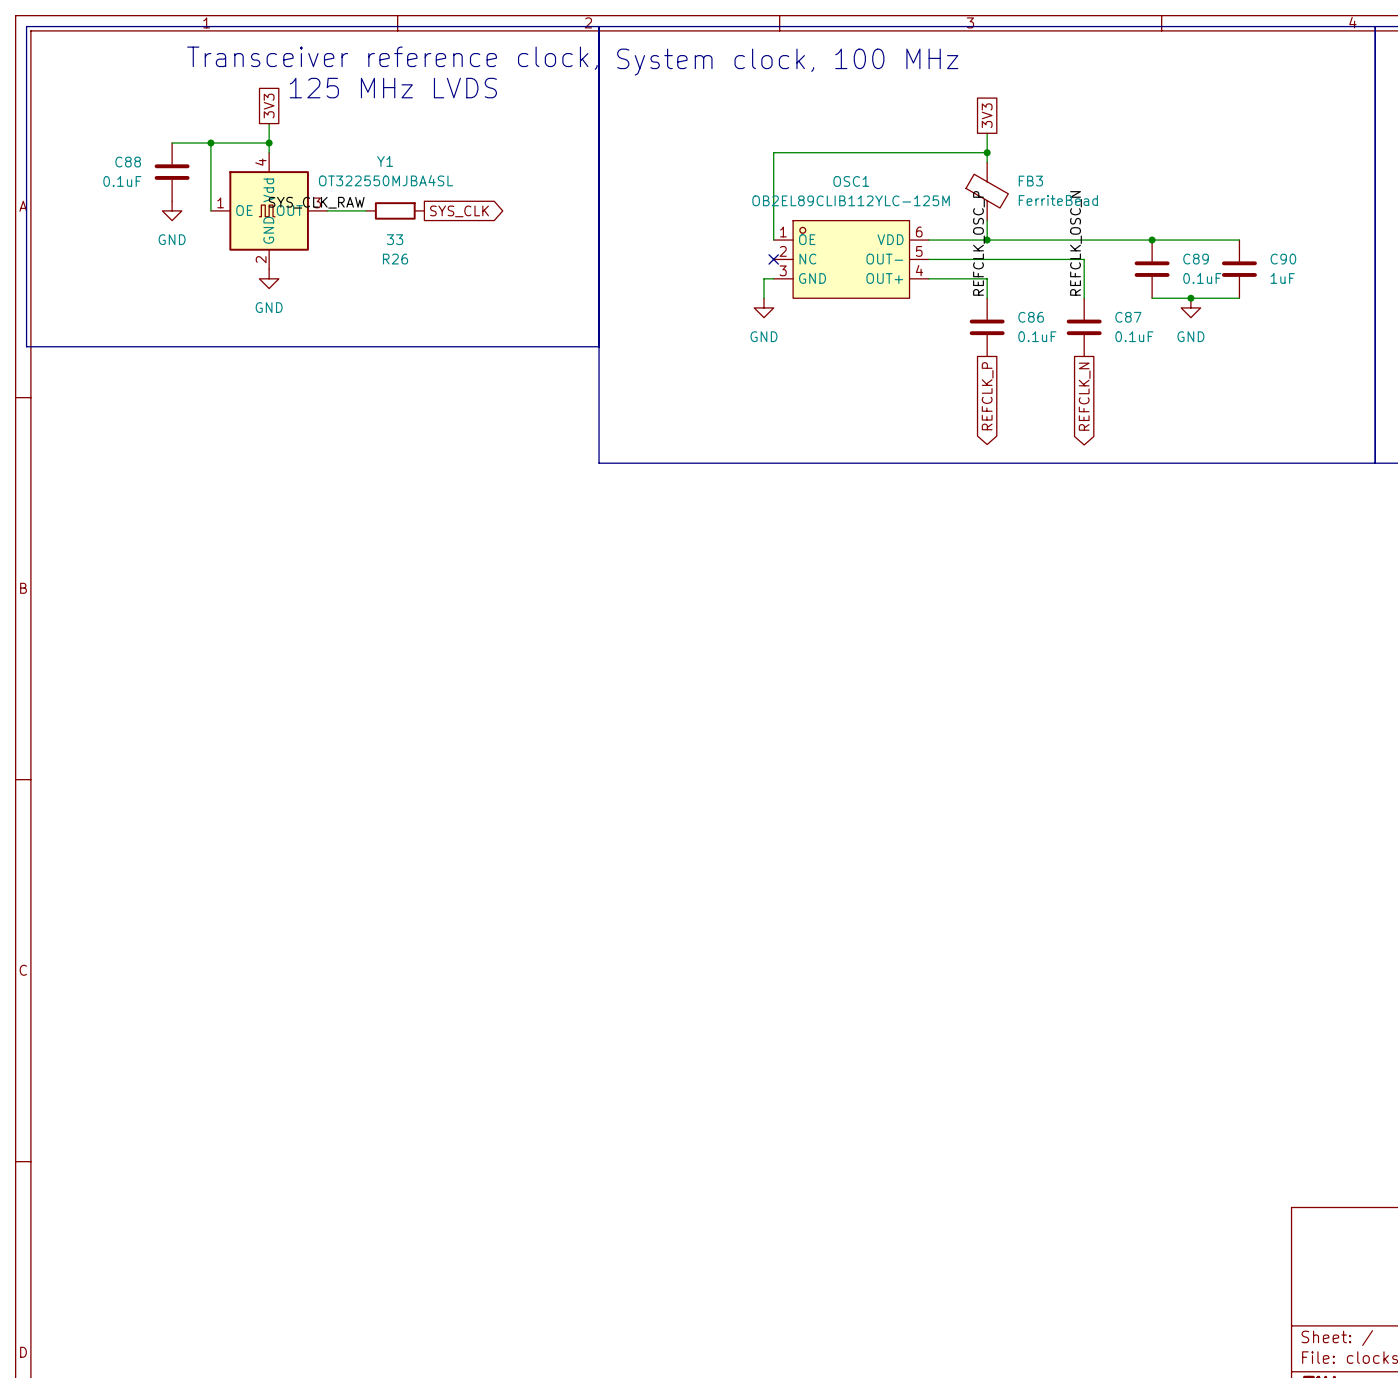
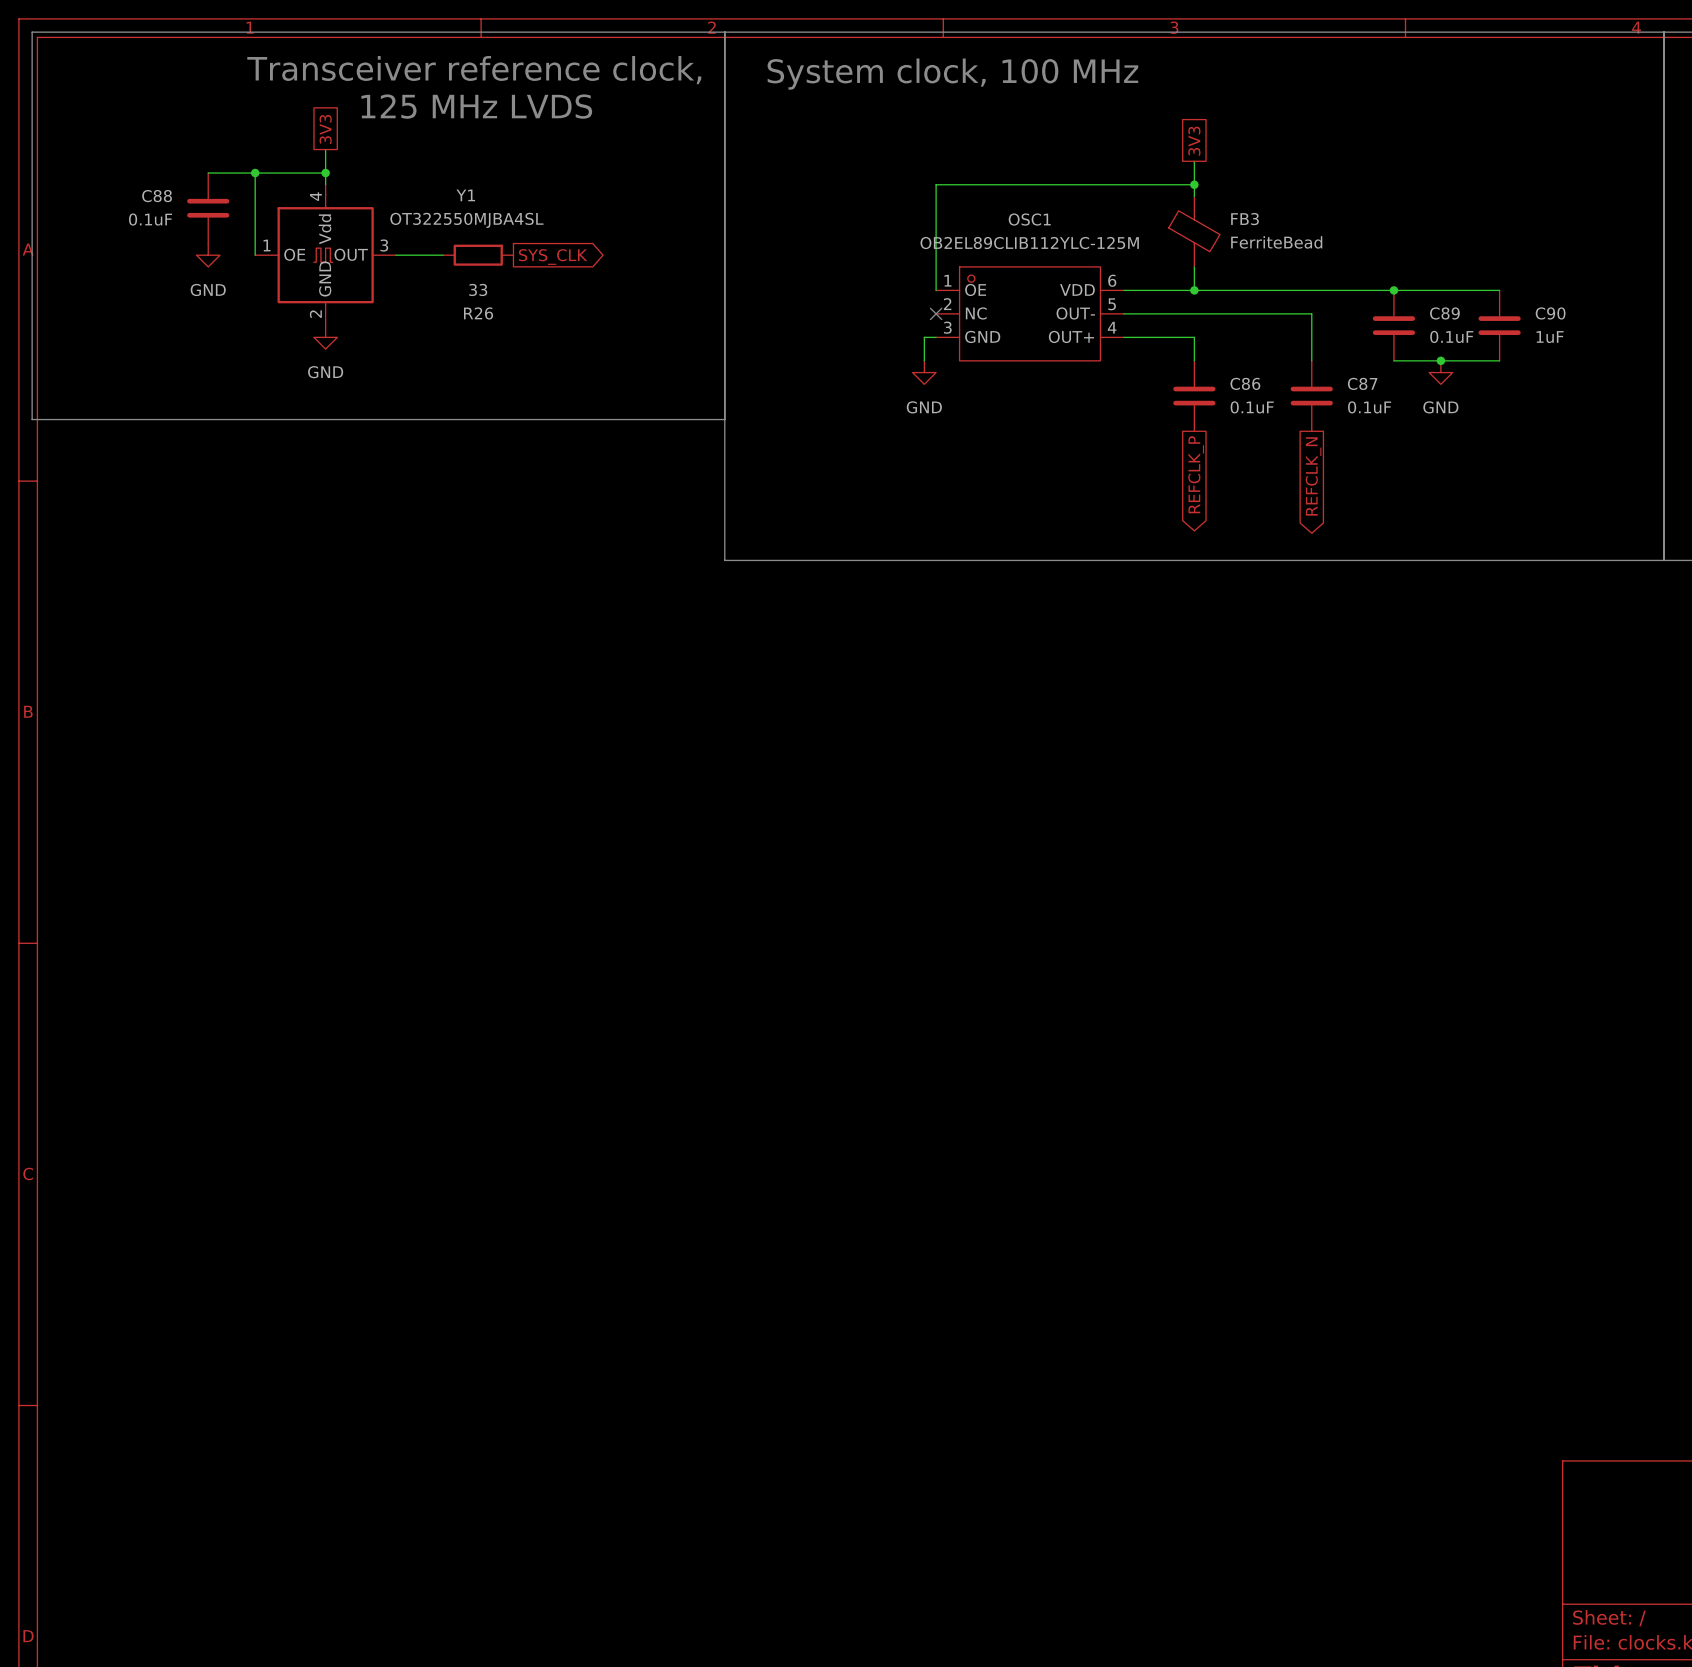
label: SYS_CLK_RAW (316, 202) -> none
label: REFCLK_OSC_P (978, 243) -> none
label: REFCLK_OSC_N (1075, 243) -> none

